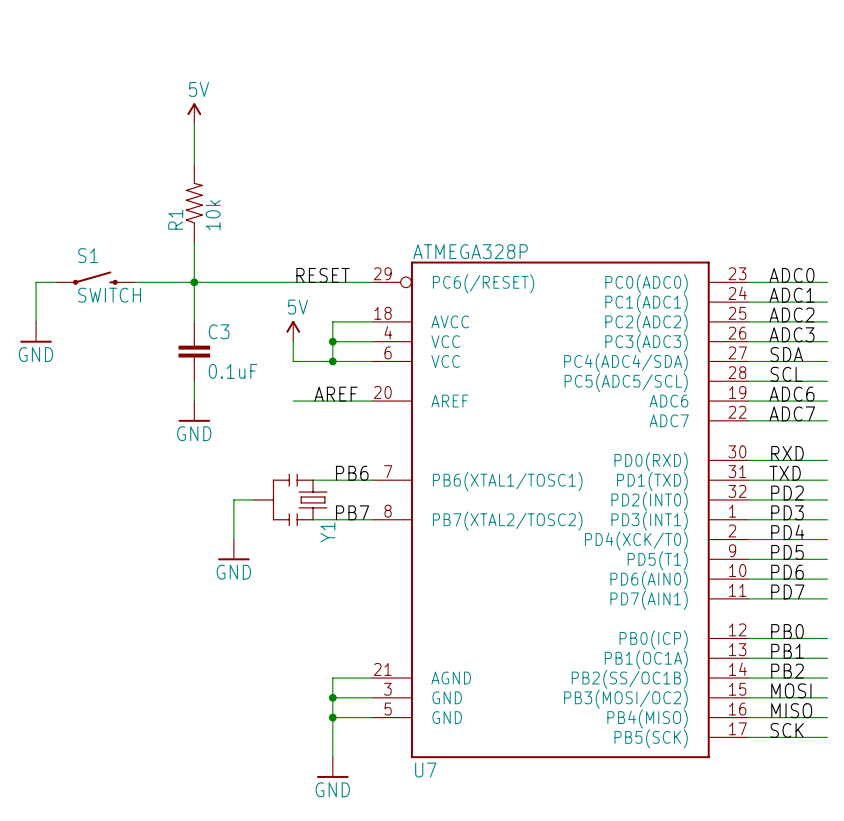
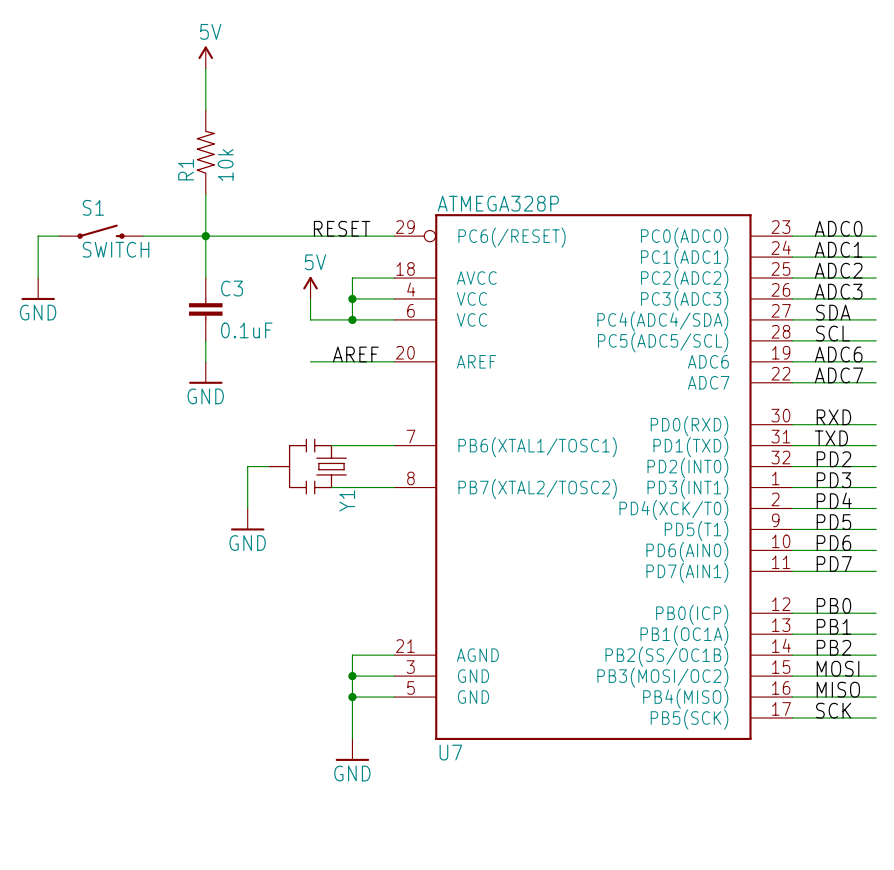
power symbol position: 5V (194, 113) -> 5V (205, 57)
wire: (194, 124) (194, 163) -> (205, 68) (205, 110)
wire: none -> (205, 194) (205, 257)
R1 position: (194, 203) -> (205, 152)
label: none -> ADC0 (838, 228)
wire: none -> (142, 236) (394, 236)
junction: none -> (205, 236)
wire: none -> (792, 236) (876, 236)
label: none -> ADC1 (838, 249)
wire: none -> (792, 257) (876, 257)
label: none -> ADC2 (838, 270)
label position: RESET (323, 275) -> RESET (342, 228)
label: ADC0 (791, 275) -> ADC3 (838, 291)
S1 position: (95, 278) -> (101, 231)
wire: (55, 282) (36, 282) (36, 321) -> (59, 236) (38, 236) (38, 278)
wire: (134, 282) (332, 282) -> none
junction: (194, 282) -> none
wire: none -> (310, 298) (310, 319) (394, 319)
junction: none -> (352, 298)
label: ADC1 (791, 295) -> SDA (833, 312)
junction: none -> (352, 319)
label: ADC2 (791, 314) -> SCL (832, 333)
wire: (372, 321) (332, 321) (332, 361) -> (394, 278) (352, 278) (352, 319)
power symbol position: 5V (293, 331) -> 5V (310, 287)
power symbol position: GND (36, 332) -> GND (38, 289)
label: ADC3 (791, 334) -> ADC6 (838, 354)
wire: (293, 341) (293, 361) (372, 361) -> (310, 361) (352, 361)
junction: (332, 341) -> none
C3 position: (194, 351) -> (205, 309)
power symbol: none -> GND (205, 372)
label: SDA (786, 354) -> ADC7 (838, 375)
junction: (332, 361) -> none
label: SCL (786, 374) -> none
wire: (194, 381) (194, 401) -> none
wire: (748, 381) (827, 381) -> (792, 278) (876, 278)
label position: AREF (336, 394) -> AREF (355, 354)
label: ADC6 (791, 394) -> RXD (833, 417)
wire: (293, 401) (372, 401) -> none
power symbol: GND (194, 411) -> none
label: ADC7 (792, 413) -> TXD (831, 438)
label: none -> PD2 (833, 459)
label: RXD (787, 453) -> PD3 (833, 480)
label: PB6 (352, 473) -> none
label: TXD (785, 473) -> PD4 (834, 500)
wire: (313, 480) (372, 480) -> (331, 445) (394, 445)
power symbol: none -> GND (247, 519)
label: PD2 (787, 493) -> PD5 (833, 522)
wire: (253, 499) (233, 499) (233, 539) -> (268, 466) (247, 466) (247, 508)
Y1 position: (290, 499) -> (307, 466)
U7 position: (560, 509) -> (593, 477)
label: PB7 (352, 512) -> none
label: PD3 (787, 512) -> PD6 (833, 543)
wire: (313, 519) (372, 519) -> (331, 487) (394, 487)
label: PD4 (787, 532) -> PD7 (834, 564)
power symbol: GND (233, 549) -> none
label: PD5 (787, 552) -> none
wire: (748, 559) (827, 559) -> (792, 466) (876, 466)
label: PD6 (787, 572) -> PB0 (833, 605)
label: PD7 (787, 591) -> PB1 (833, 626)
label: none -> PB2 (833, 647)
label: PB0 (787, 631) -> MOSI (838, 668)
wire: none -> (352, 676) (394, 676)
junction: none -> (352, 676)
label: PB1 (787, 651) -> MISO (838, 689)
junction: none -> (352, 697)
label: PB2 (787, 671) -> SCK (833, 710)
wire: (332, 678) (372, 678) -> (352, 718) (352, 655) (394, 655)
label: MOSI (791, 690) -> none
junction: (332, 697) -> none
wire: (372, 697) (332, 697) (332, 757) -> none
wire: (748, 697) (827, 697) -> (792, 655) (876, 655)
label: MISO (791, 710) -> none
wire: (332, 717) (372, 717) -> (352, 697) (394, 697)
junction: (332, 717) -> none
wire: (748, 717) (827, 717) -> none
label: SCK (787, 730) -> none
wire: (748, 737) (827, 737) -> none
power symbol position: GND (332, 767) -> GND (352, 749)

